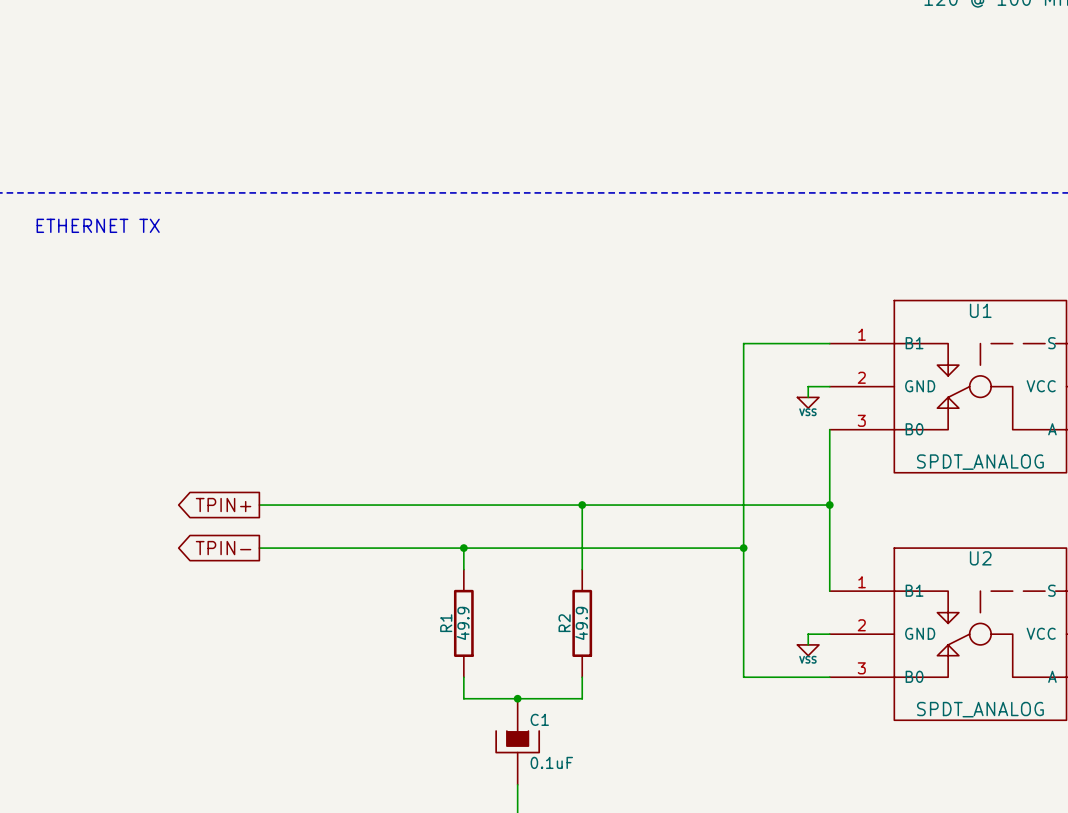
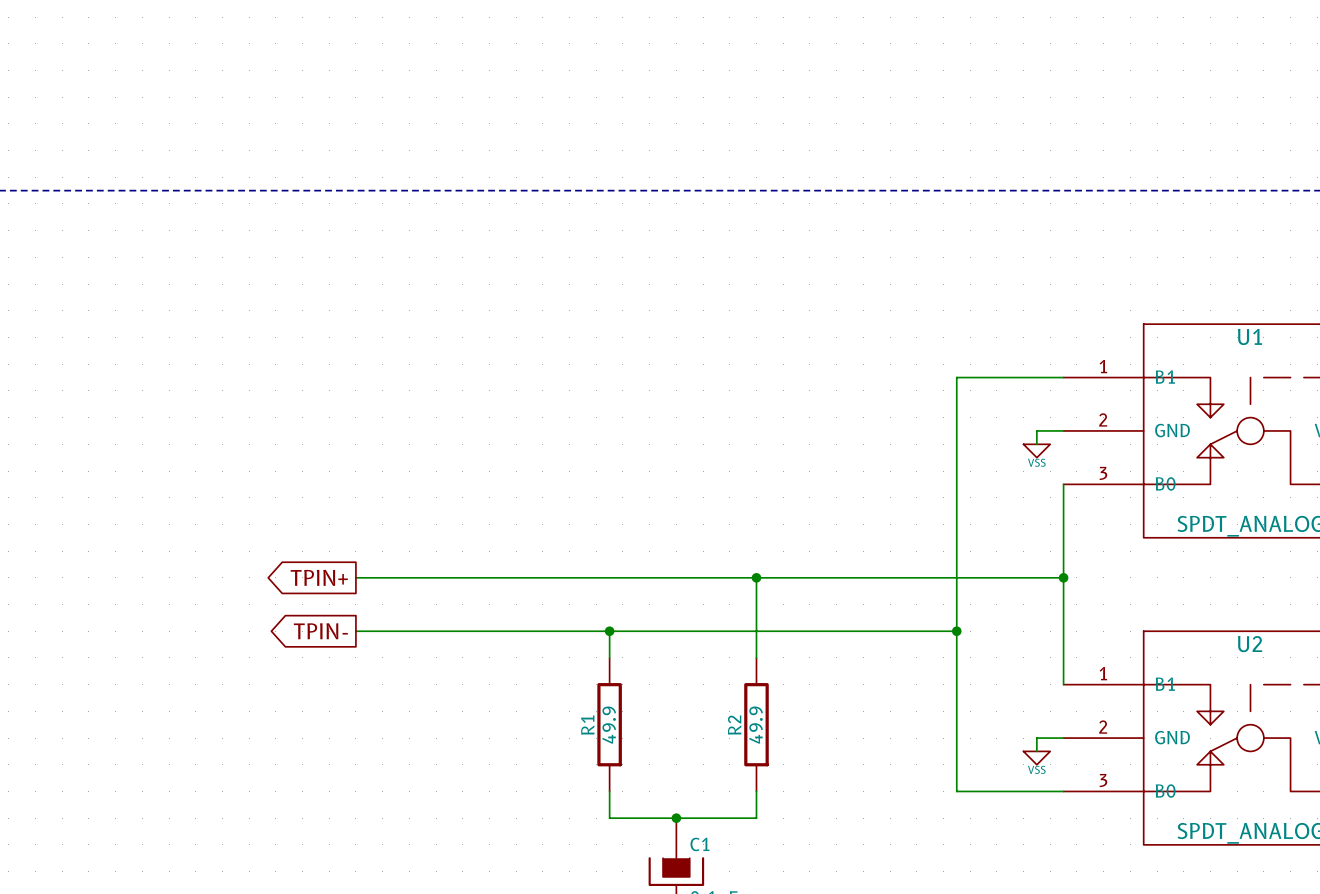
text: ETHERNET TX (98, 225) -> none

